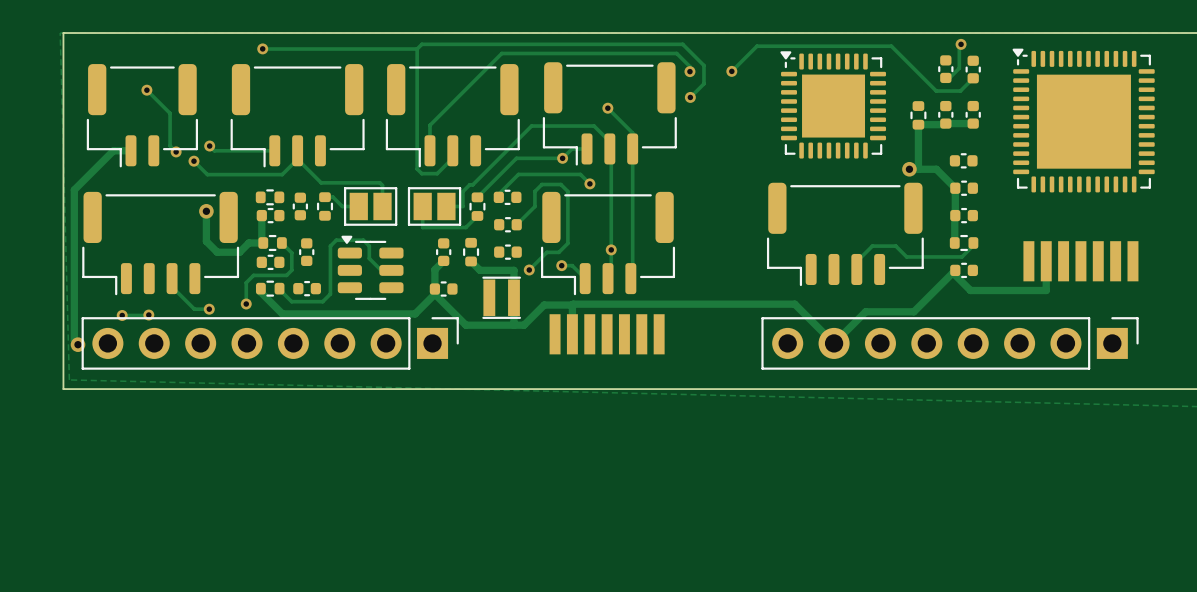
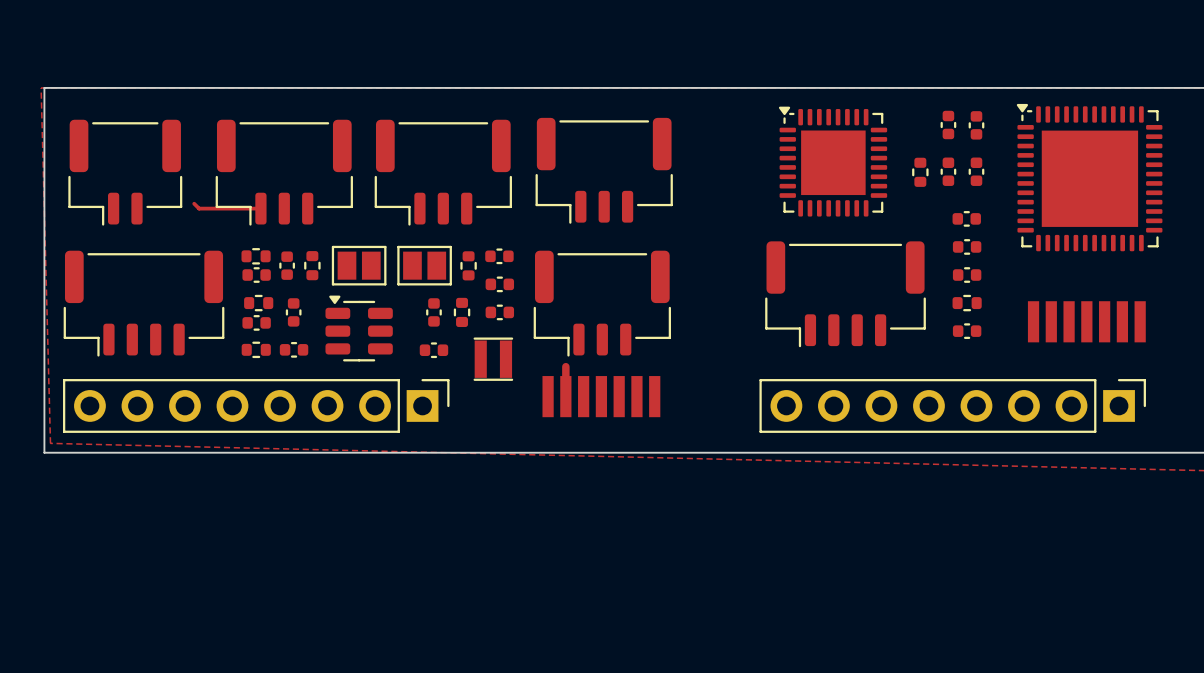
track: (961, 44) (959, 46) (959, 68) (949, 77) (945, 77) -> none
via: (961, 44) -> none
via: (262, 48) -> none
track: (262, 49) (417, 49) -> none
track: (417, 49) (417, 169) (421, 173) (437, 173) (452, 158) (452, 150) -> none
track: (417, 49) (421, 44) (682, 44) (703, 65) (703, 83) (690, 97) -> none
track: (689, 71) (689, 66) (676, 53) (501, 53) (429, 125) (429, 150) -> none
via: (689, 71) -> none
track: (731, 71) (756, 46) (891, 46) (936, 91) (960, 91) (973, 78) -> none
via: (731, 71) -> none
track: (146, 90) (170, 113) (170, 145) (176, 151) -> none
via: (146, 90) -> none
via: (690, 97) -> none
track: (607, 108) (632, 133) (632, 276) (630, 278) -> none
via: (607, 108) -> none
track: (973, 123) (918, 124) (918, 169) -> none
via: (209, 146) -> none
track: (587, 148) (571, 148) (562, 158) (516, 158) (477, 197) -> none
track: (130, 150) (113, 150) (74, 189) (74, 341) (78, 344) -> none
via: (176, 151) -> none
via: (562, 158) -> none
track: (297, 159) (282, 174) (207, 174) (193, 161) -> none
track: (297, 159) (321, 182) (379, 182) (382, 185) (382, 206) -> none
via: (193, 161) -> none
track: (909, 169) (936, 169) (955, 188) (954, 243) -> none
via: (909, 169) -> none
track: (589, 183) (580, 174) (518, 174) (498, 194) (498, 197) -> none
via: (589, 183) -> none
track: (324, 197) (333, 197) (342, 206) (358, 206) -> none
track: (422, 206) (422, 227) (465, 227) (477, 215) -> none
track: (446, 206) (462, 206) (462, 191) (469, 184) (472, 184) (531, 126) (594, 126) (609, 141) (611, 150) (611, 275) (608, 278) -> none
track: (206, 211) (206, 241) (217, 252) (239, 252) (248, 243) (263, 243) (261, 215) -> none
via: (206, 211) -> none
track: (516, 224) (534, 206) (534, 191) (541, 184) (560, 184) (567, 191) (567, 243) (558, 252) (546, 252) (529, 269) -> none
track: (281, 243) (291, 252) (291, 270) (286, 275) (253, 275) (246, 282) (246, 304) -> none
track: (973, 243) (973, 245) (961, 256) (906, 256) (895, 246) (872, 246) (856, 261) (856, 269) -> none
via: (611, 249) -> none
track: (443, 260) (434, 269) (434, 294) -> none
track: (471, 261) (479, 270) (513, 270) (513, 325) -> none
track: (1046, 261) (1046, 290) (970, 290) (952, 272) -> none
track: (561, 265) (572, 265) (585, 278) -> none
via: (561, 265) -> none
via: (529, 269) -> none
track: (391, 270) (381, 270) (369, 258) (369, 246) (363, 240) (336, 240) (330, 246) (330, 294) (322, 301) (291, 301) (279, 288) -> none
track: (955, 270) (913, 311) (865, 311) (834, 343) (794, 304) (544, 305) (524, 325) (465, 325) (434, 294) -> none
track: (172, 278) (172, 286) (194, 309) (209, 309) -> none
track: (260, 288) (260, 292) (282, 313) (415, 313) (434, 294) -> none
via: (246, 304) -> none
via: (209, 309) -> none
via: (122, 315) -> none
track: (148, 315) (122, 315) -> none
via: (148, 315) -> none
via: (78, 344) -> none

